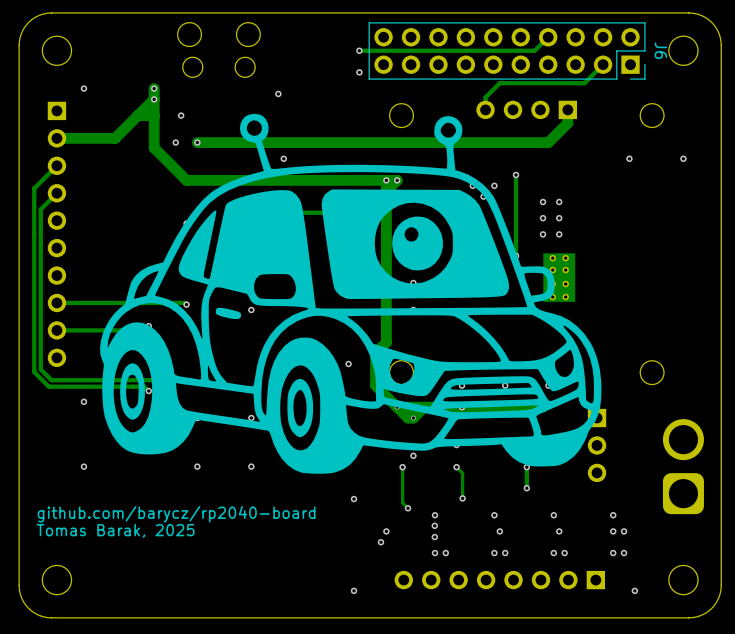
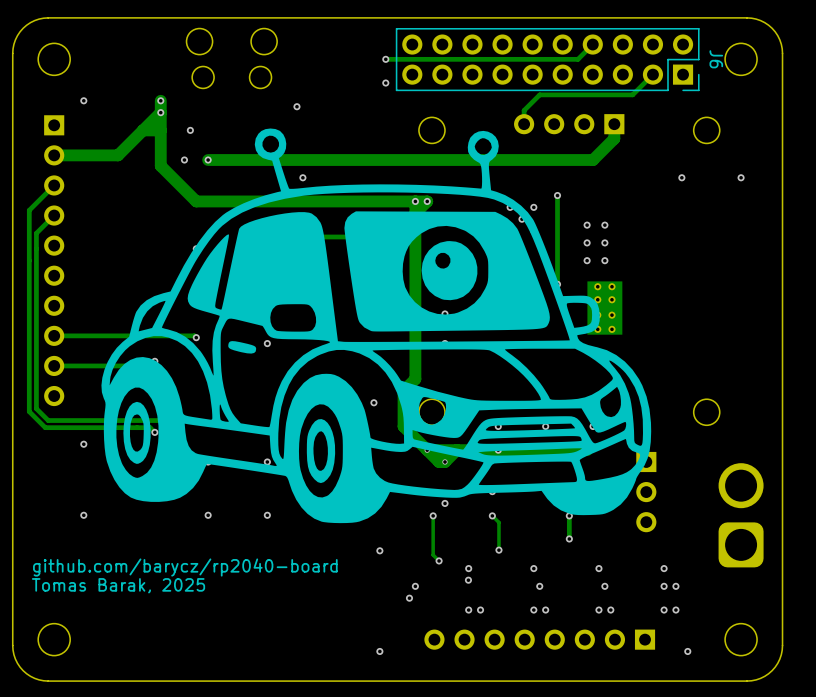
via: (434, 537) -> none

